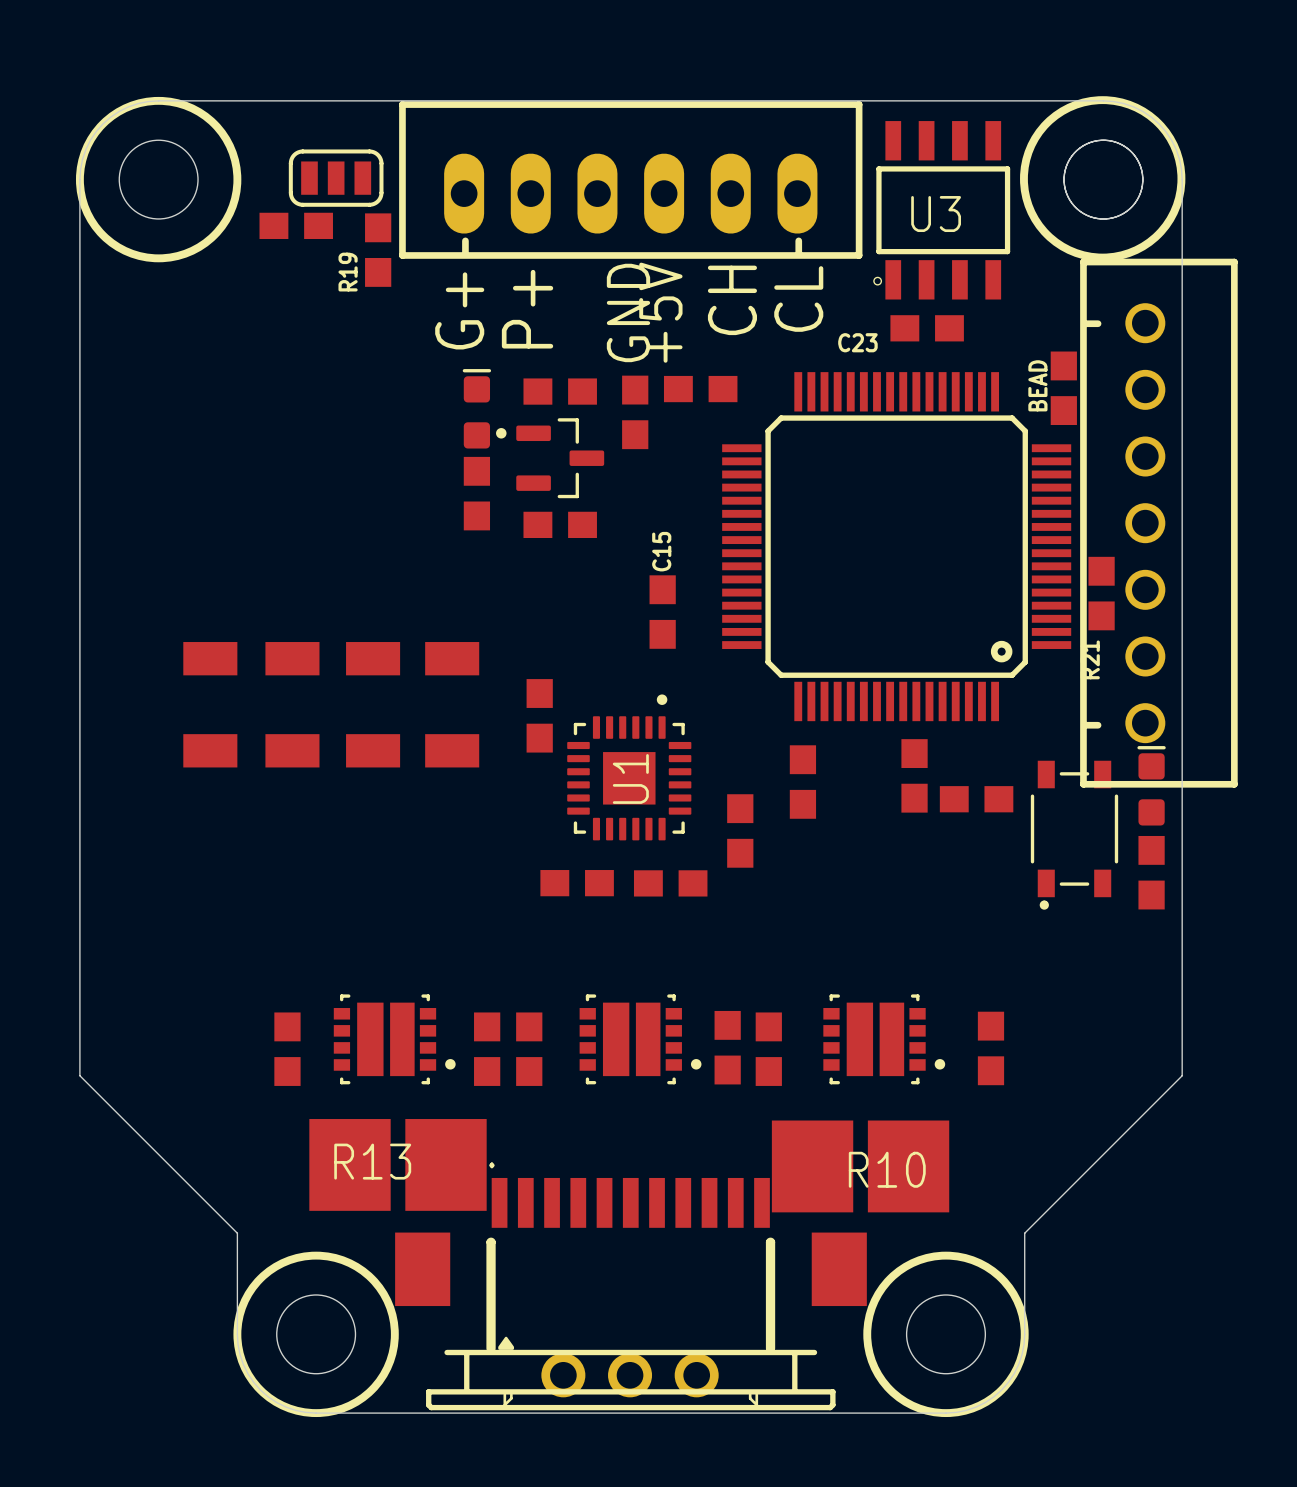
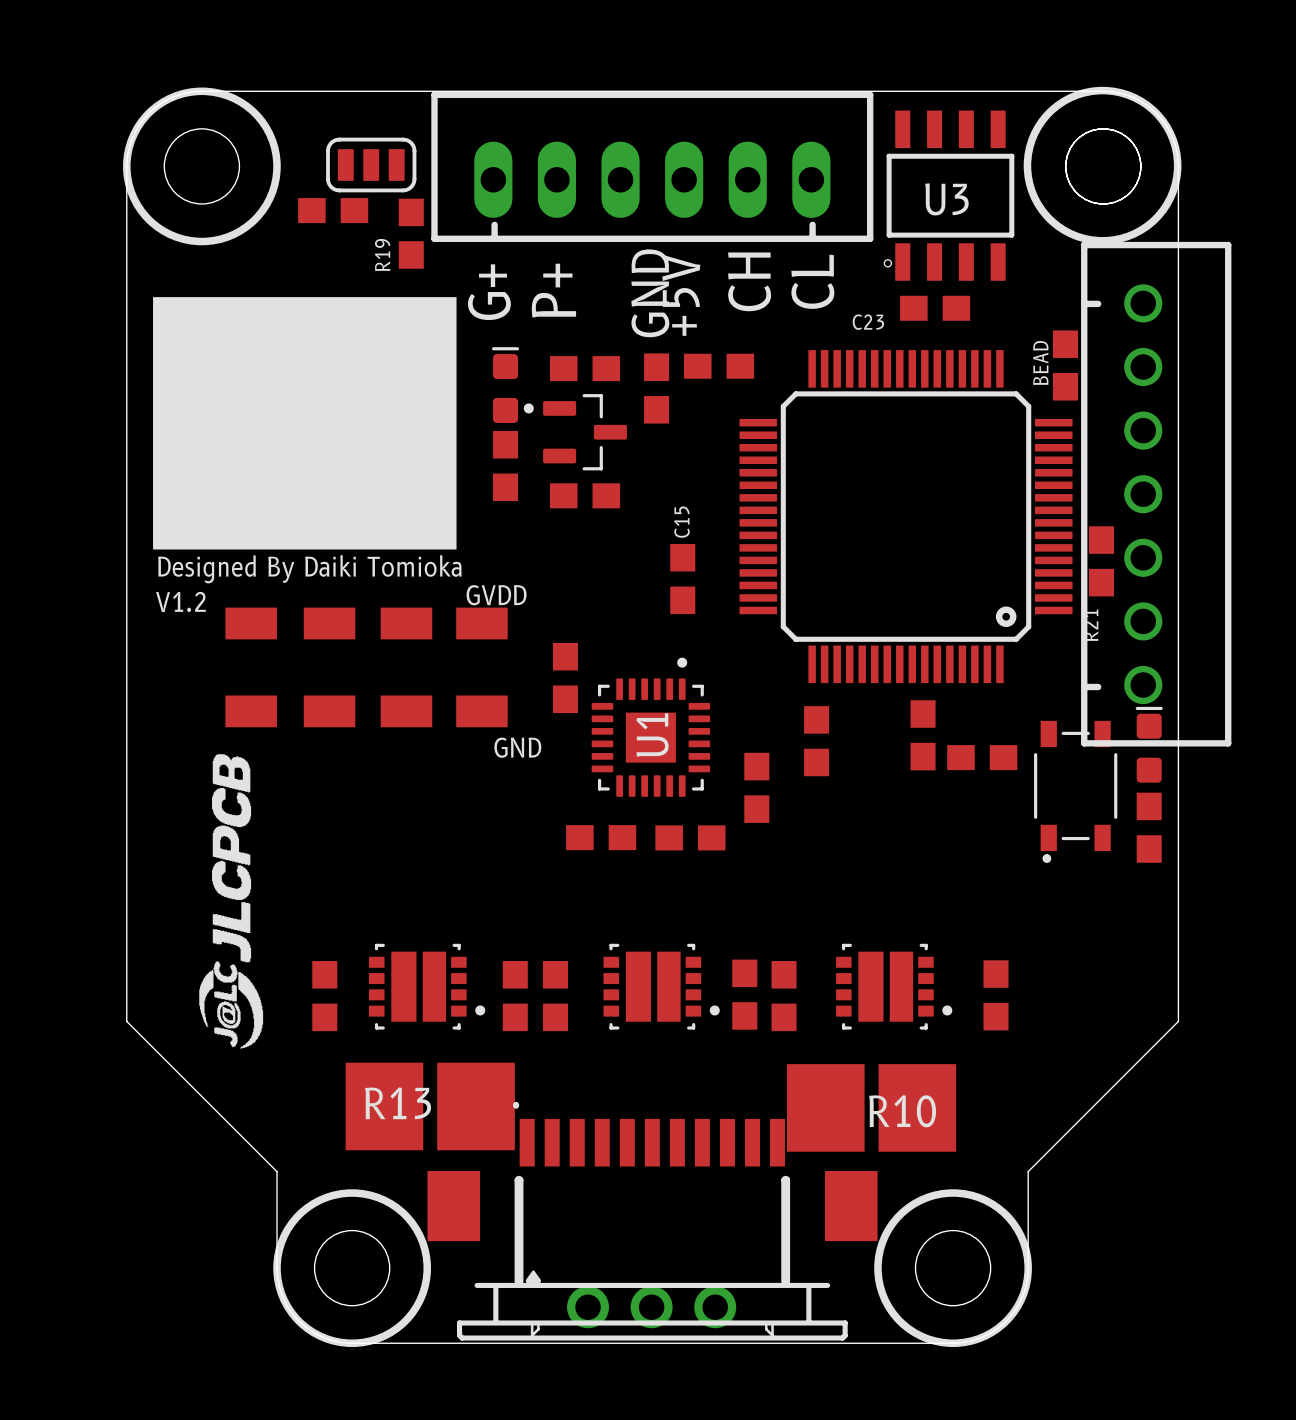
drawing: none -> [153, 297, 457, 550]
text: none -> Designed By Daiki Tomioka (309, 569)
text: none -> GVDD (496, 595)
text: none -> V1.2 (180, 601)
text: none -> GND (517, 747)
drawing: none -> [199, 754, 264, 1049]

